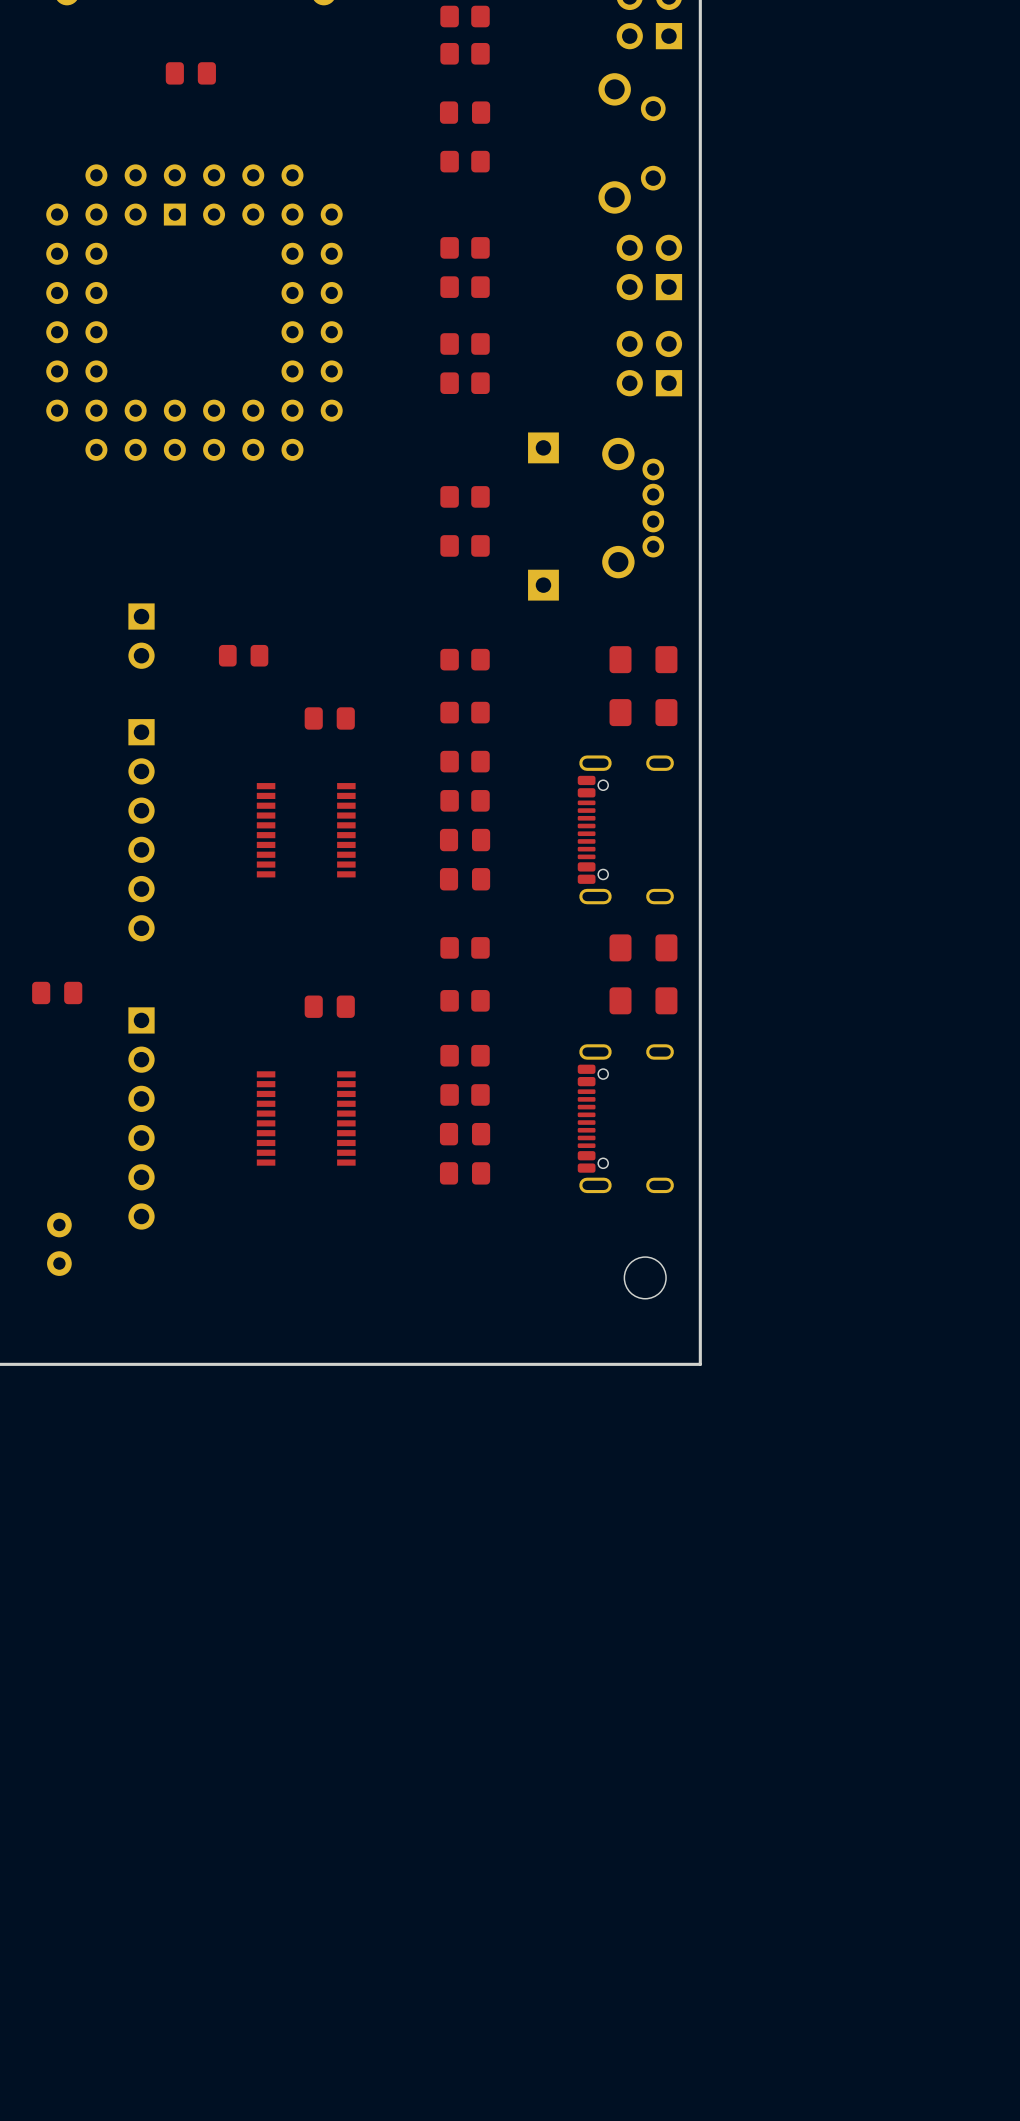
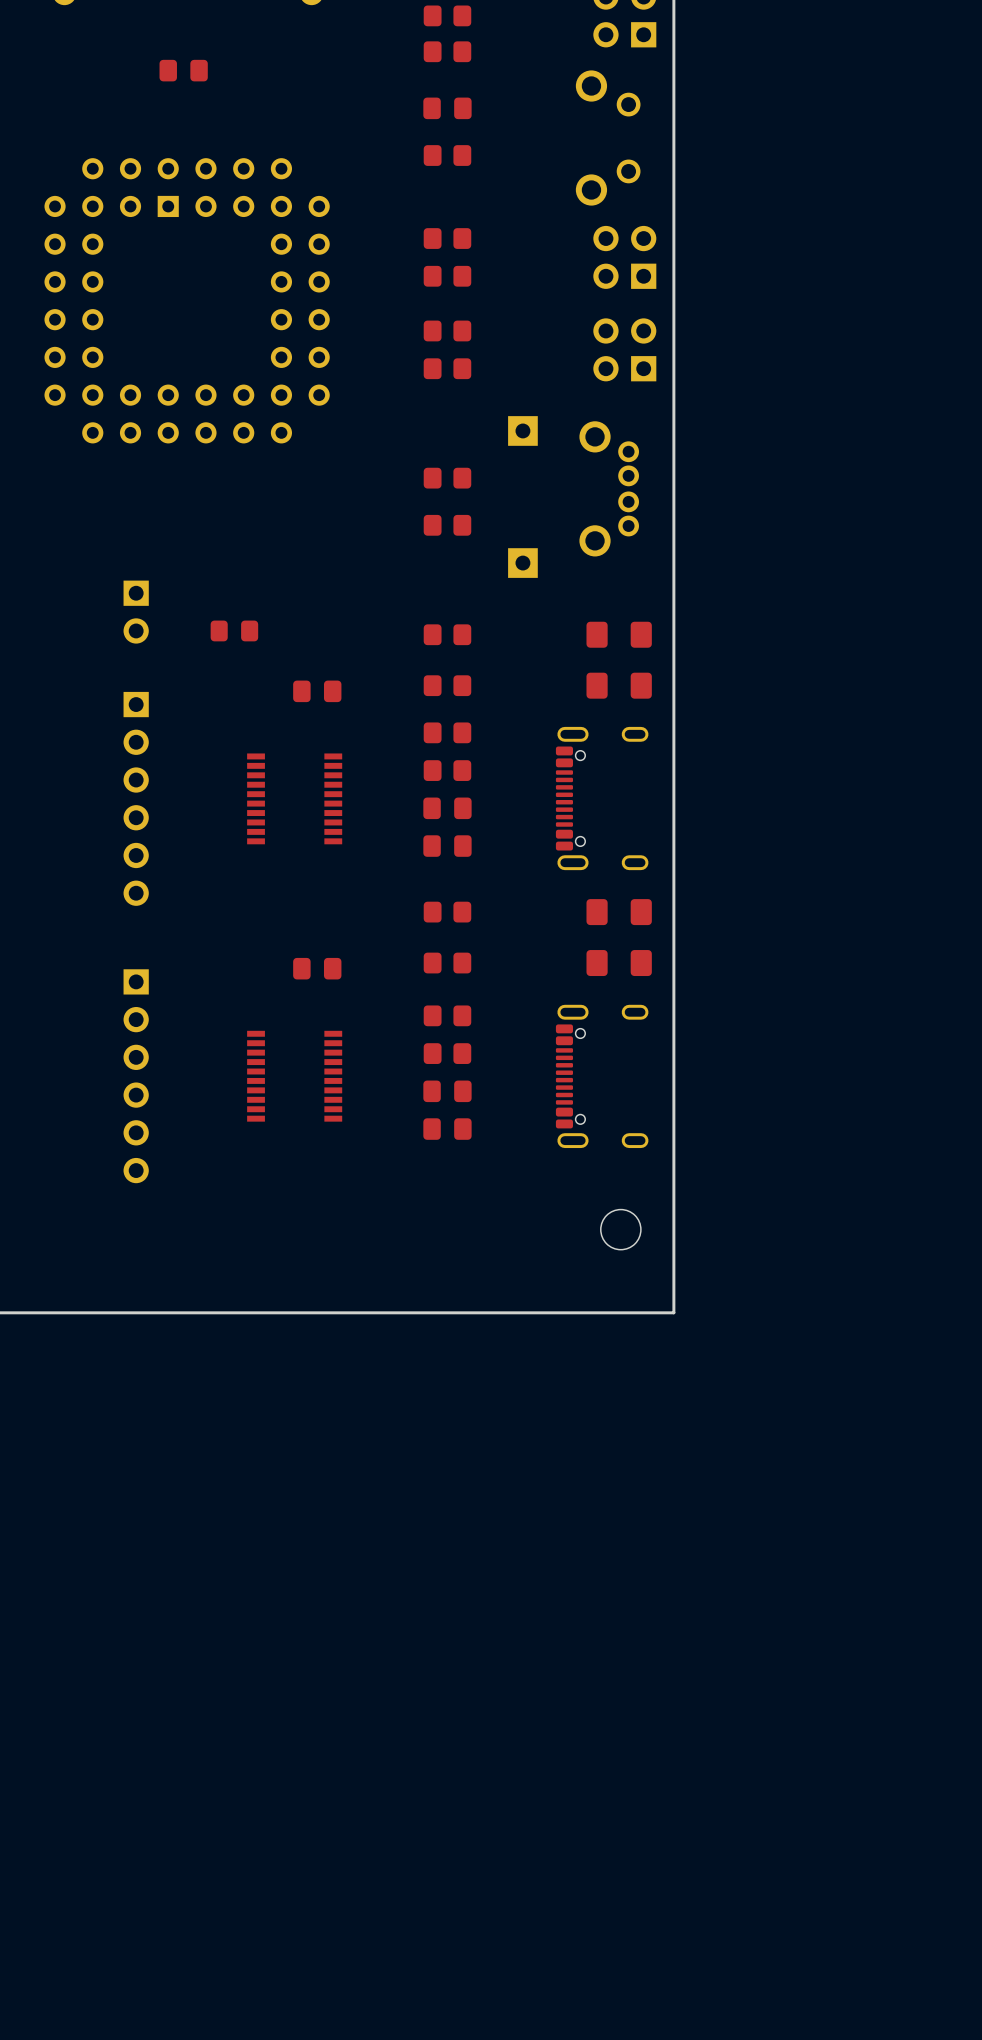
part: (57, 992) -> none
part: (59, 1244) -> none

